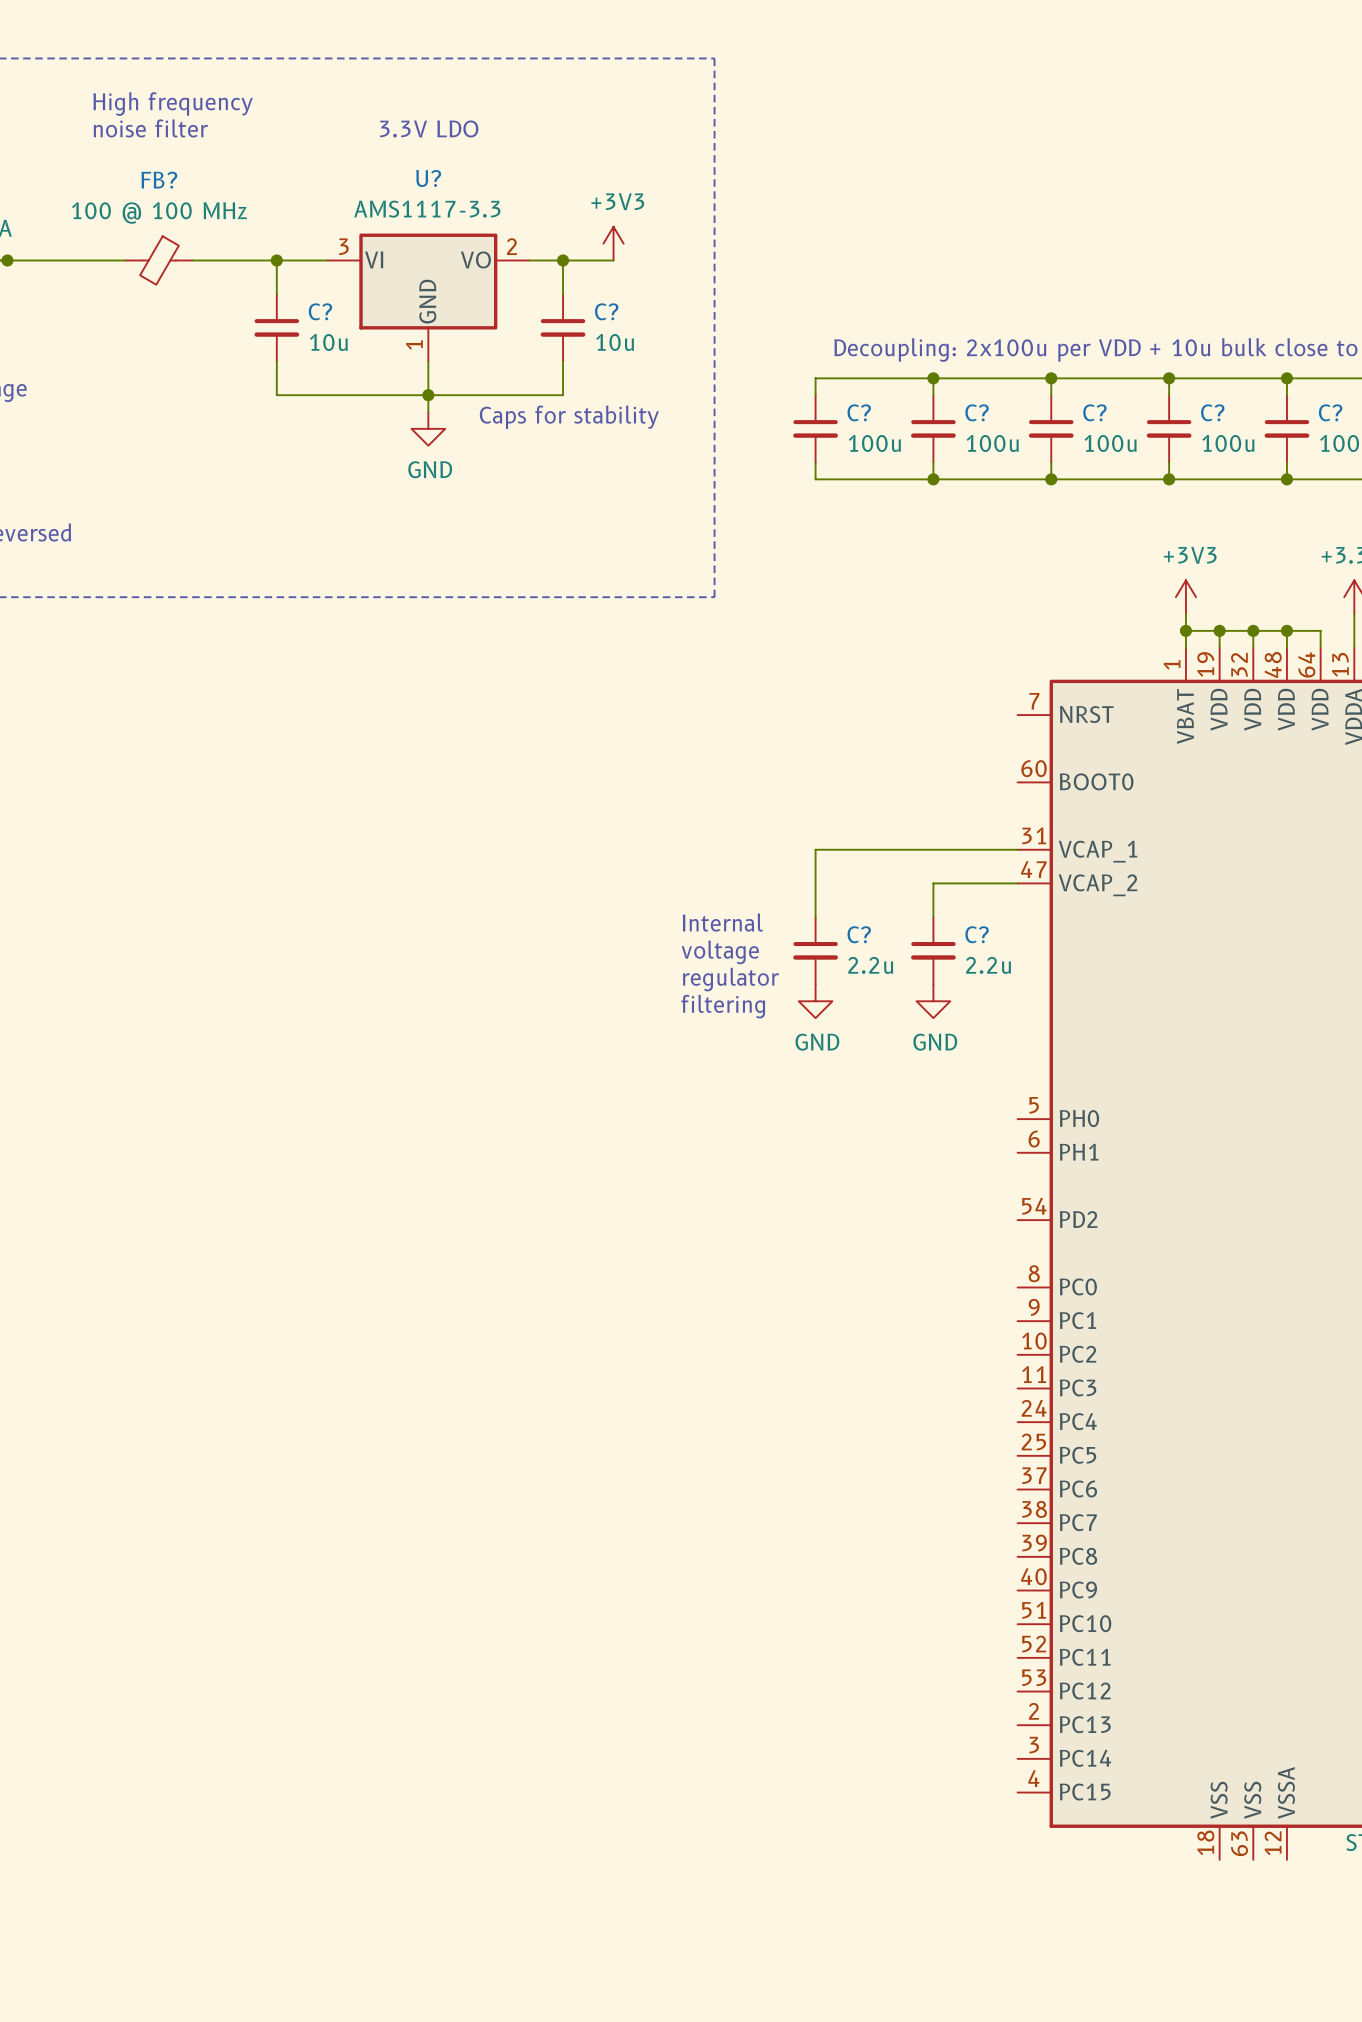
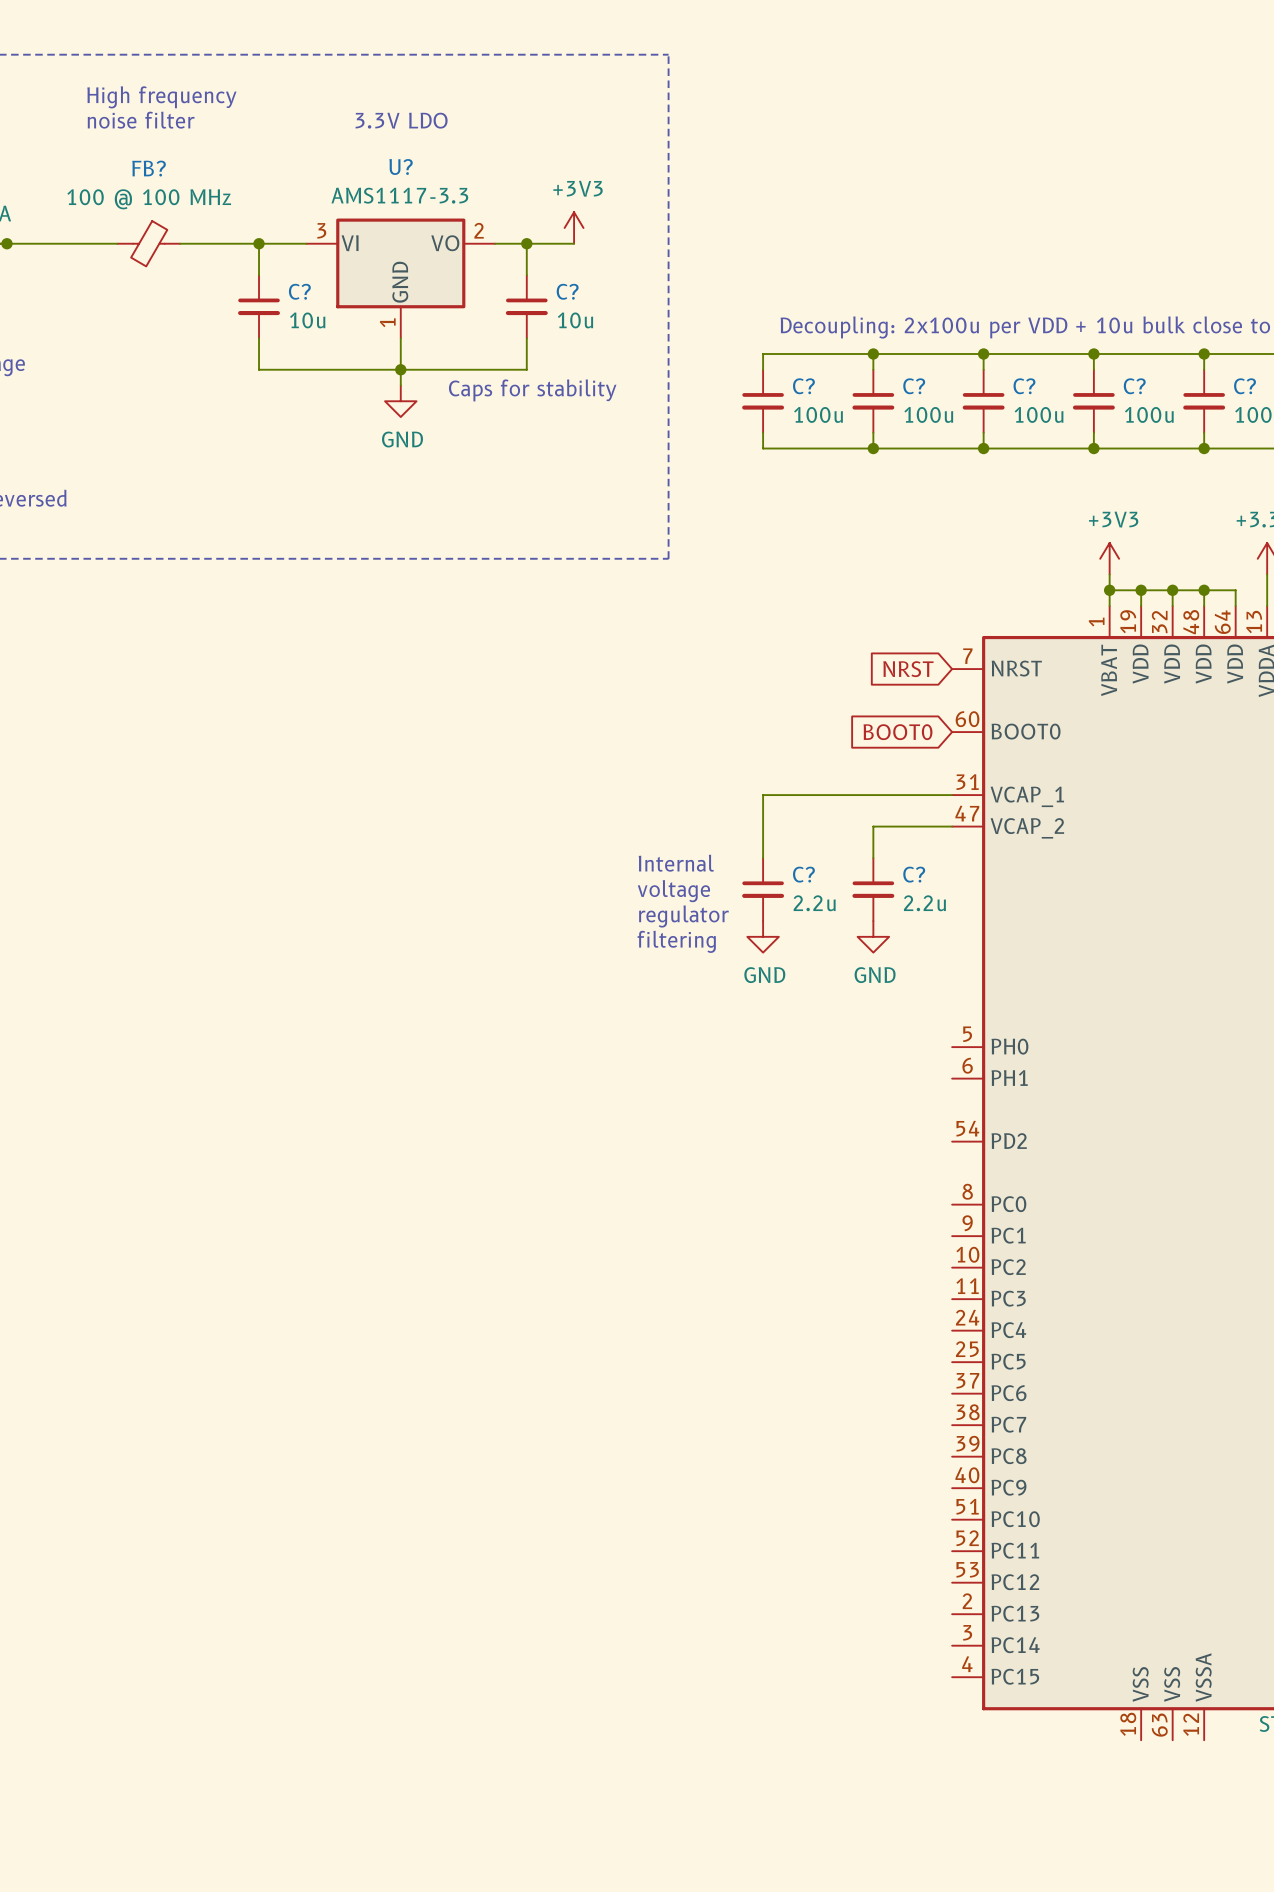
global label: none -> NRST (908, 669)
global label: none -> BOOT0 (897, 732)

